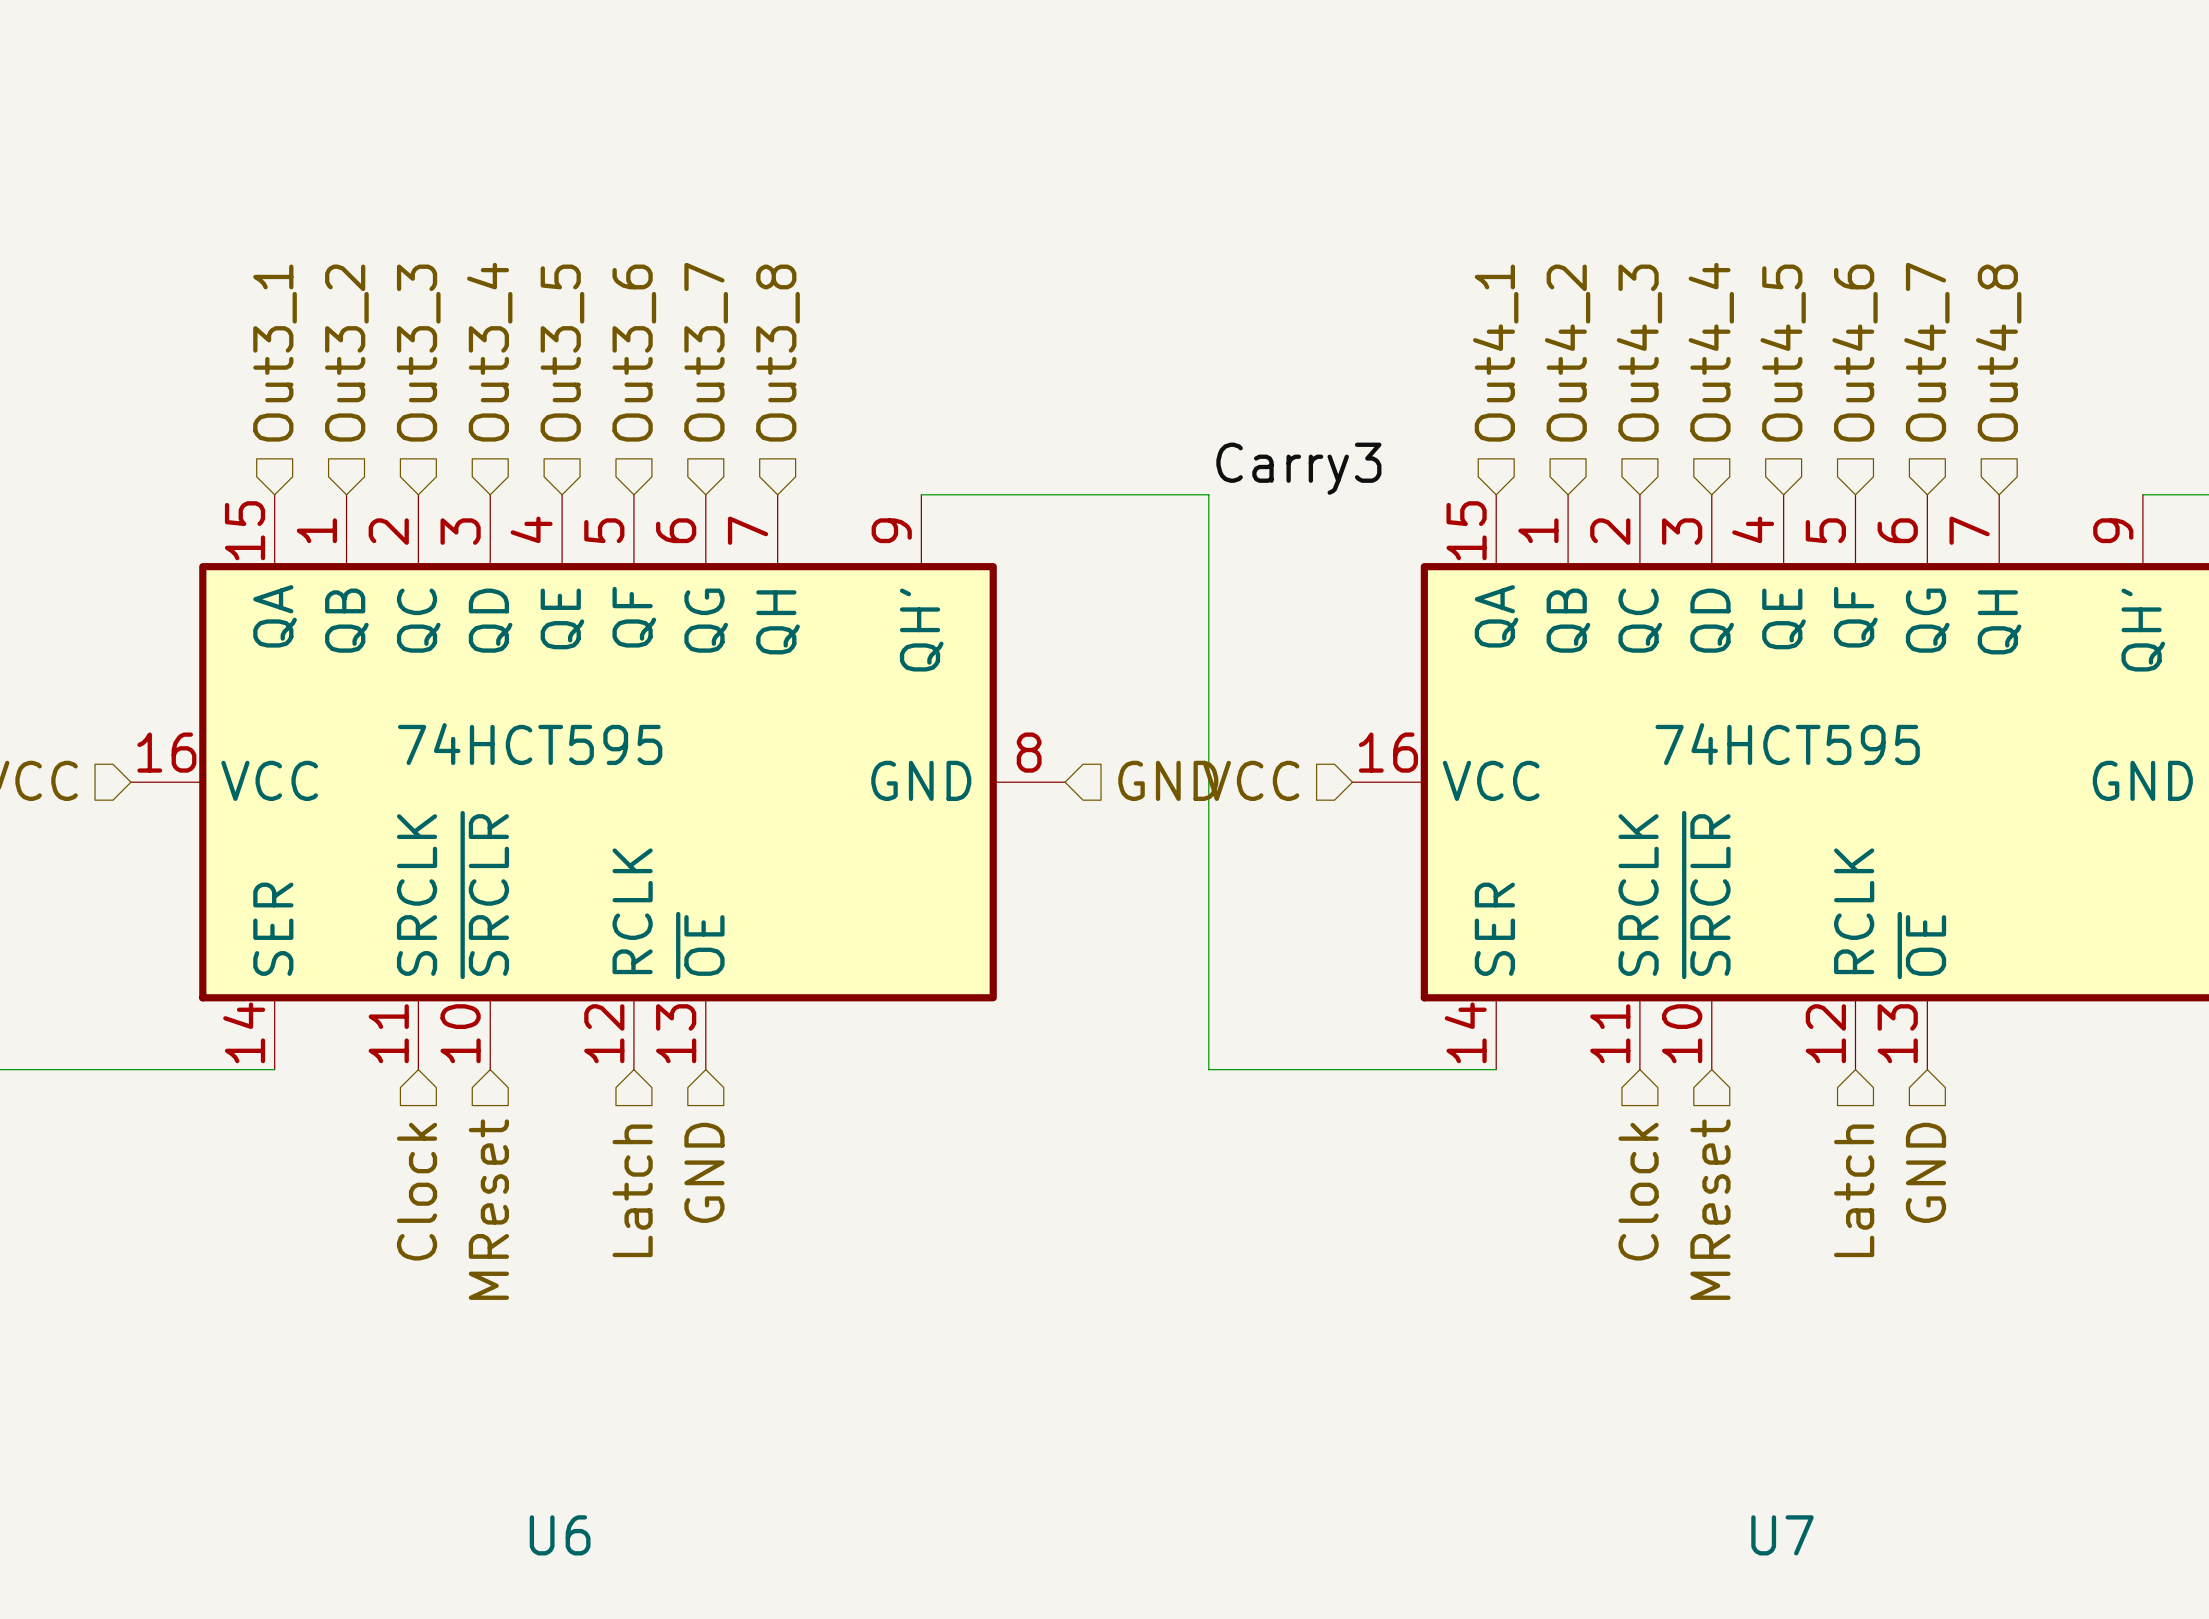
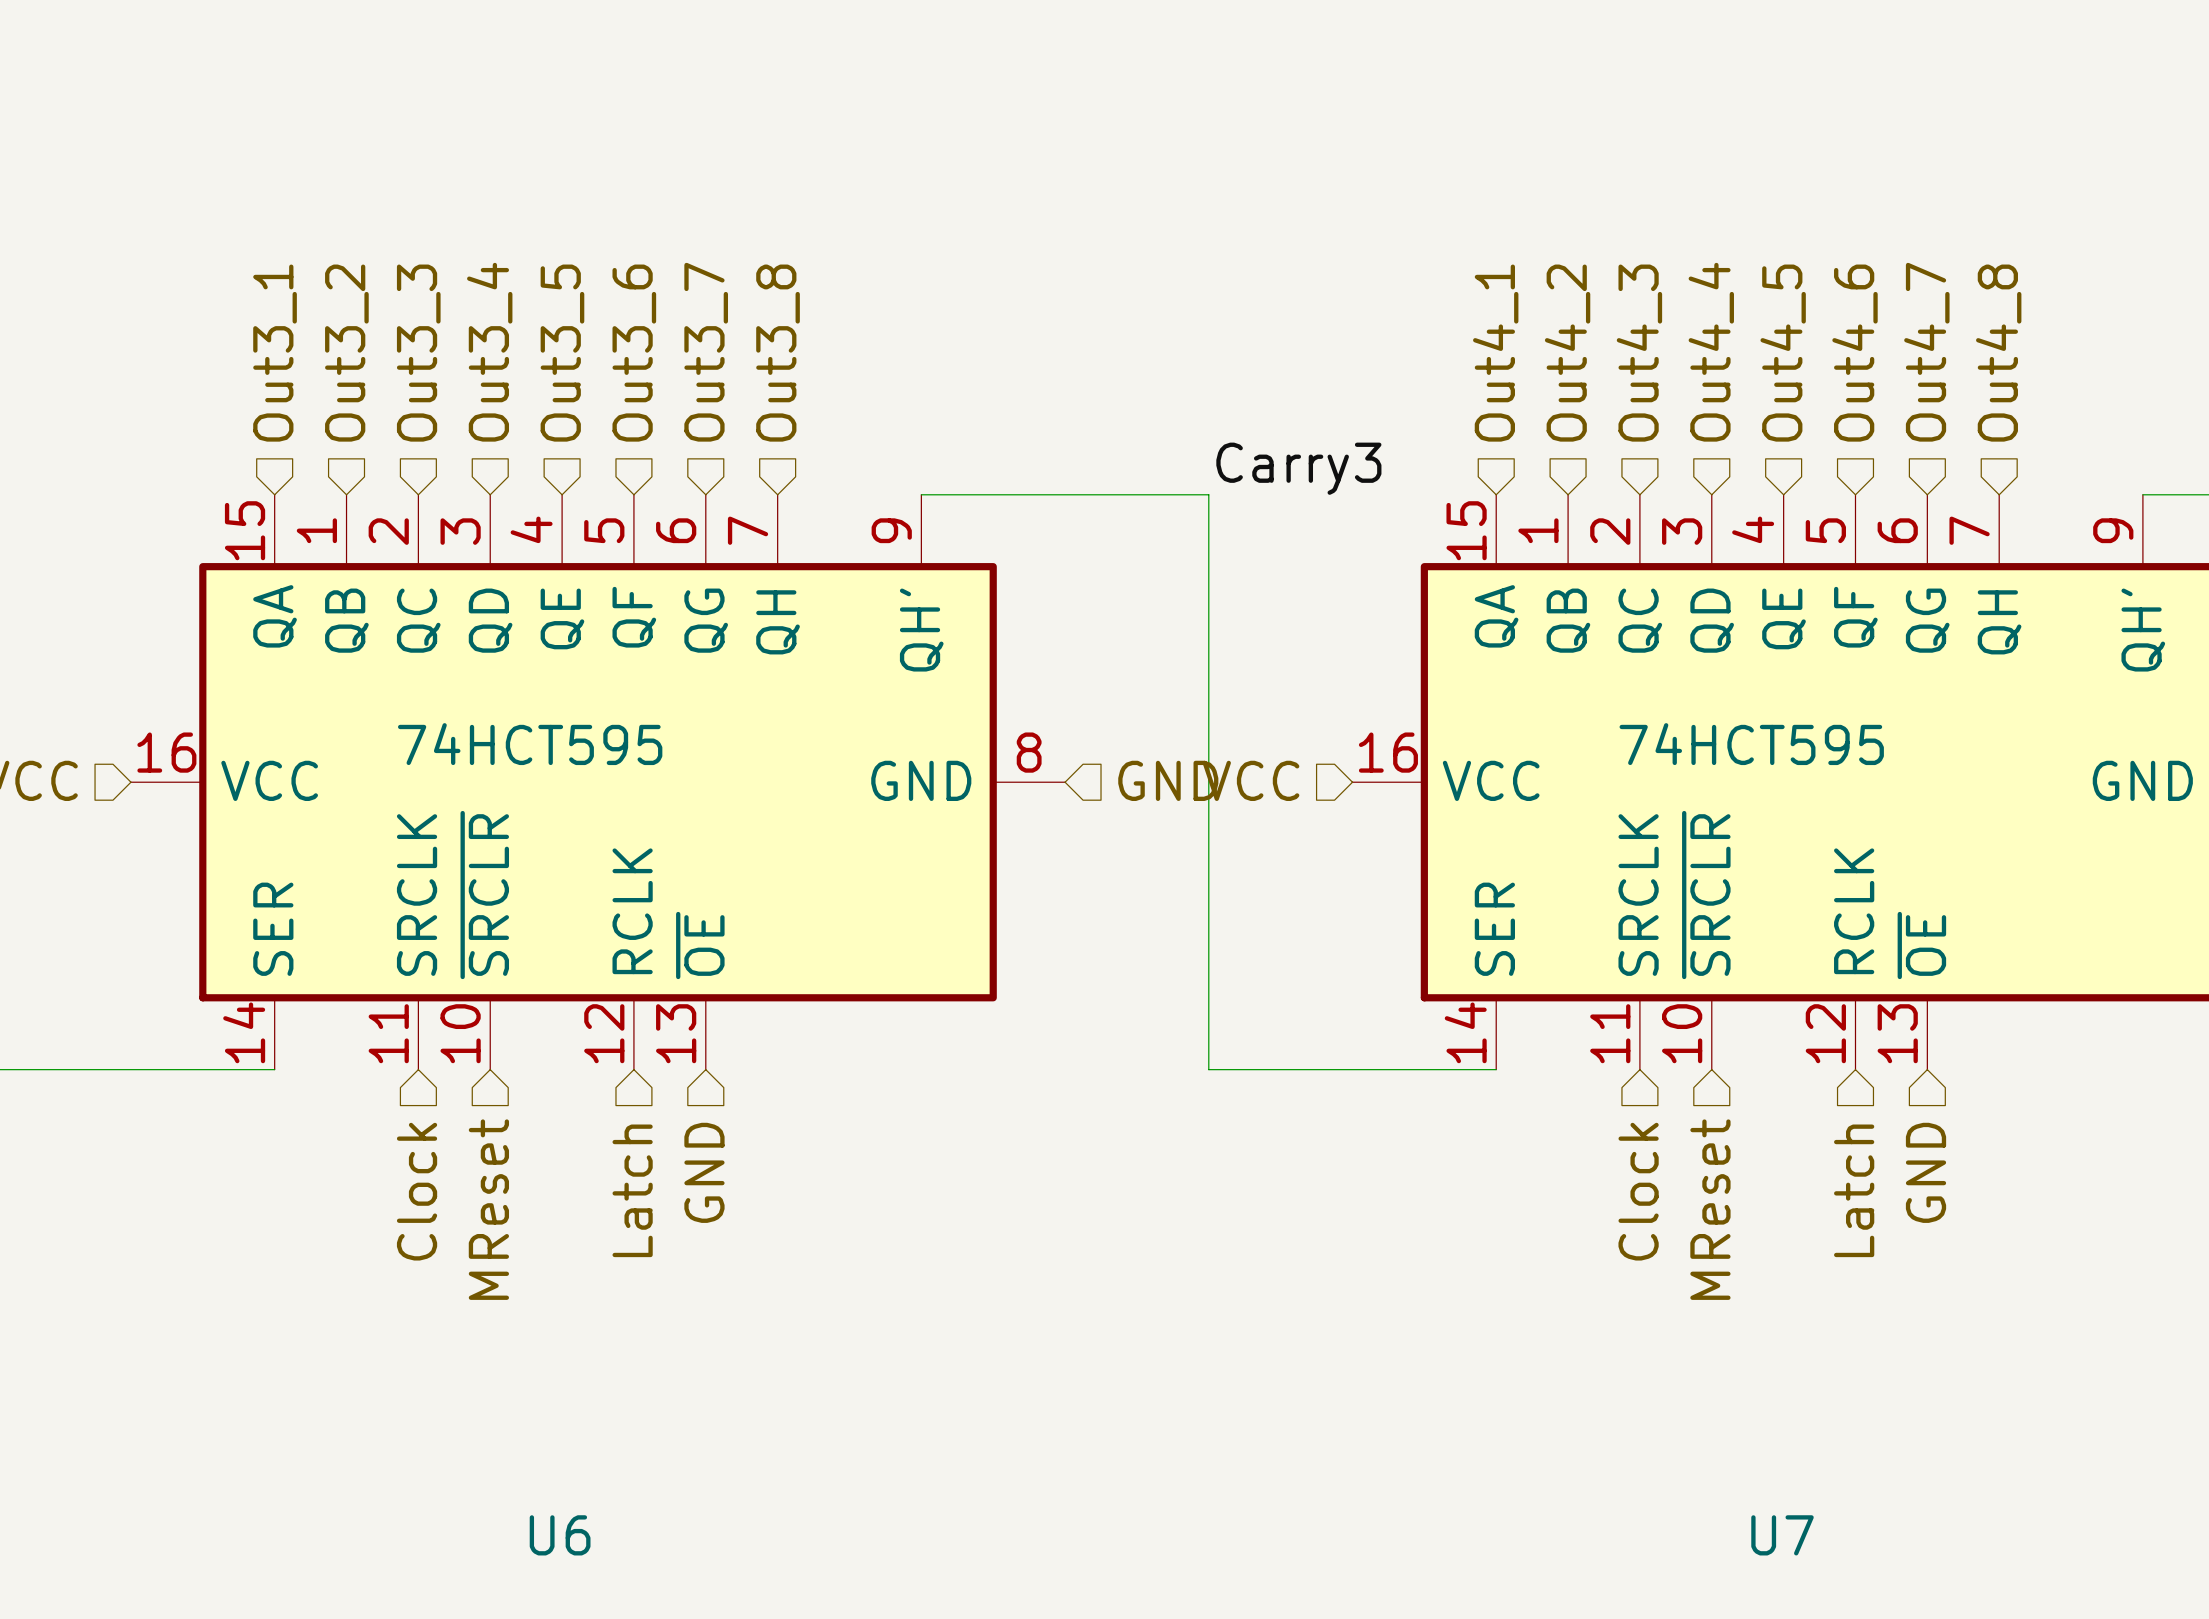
U7 value position: 74HCT595 (1787, 744) -> 74HCT595 (1751, 744)

